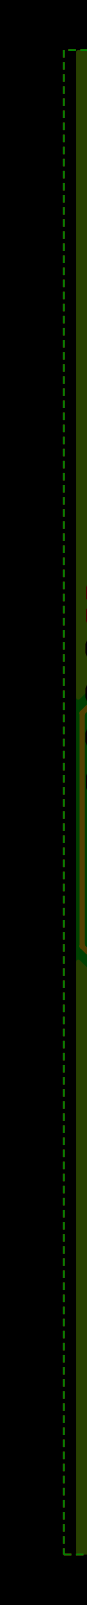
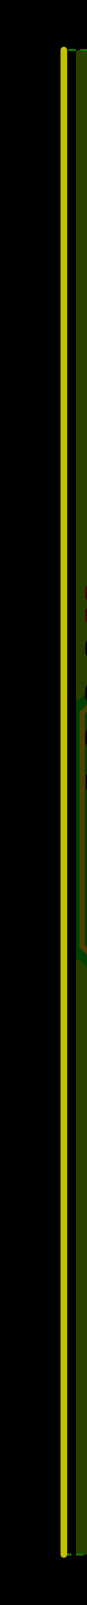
board edge: none -> (63, 50) (63, 1554)

